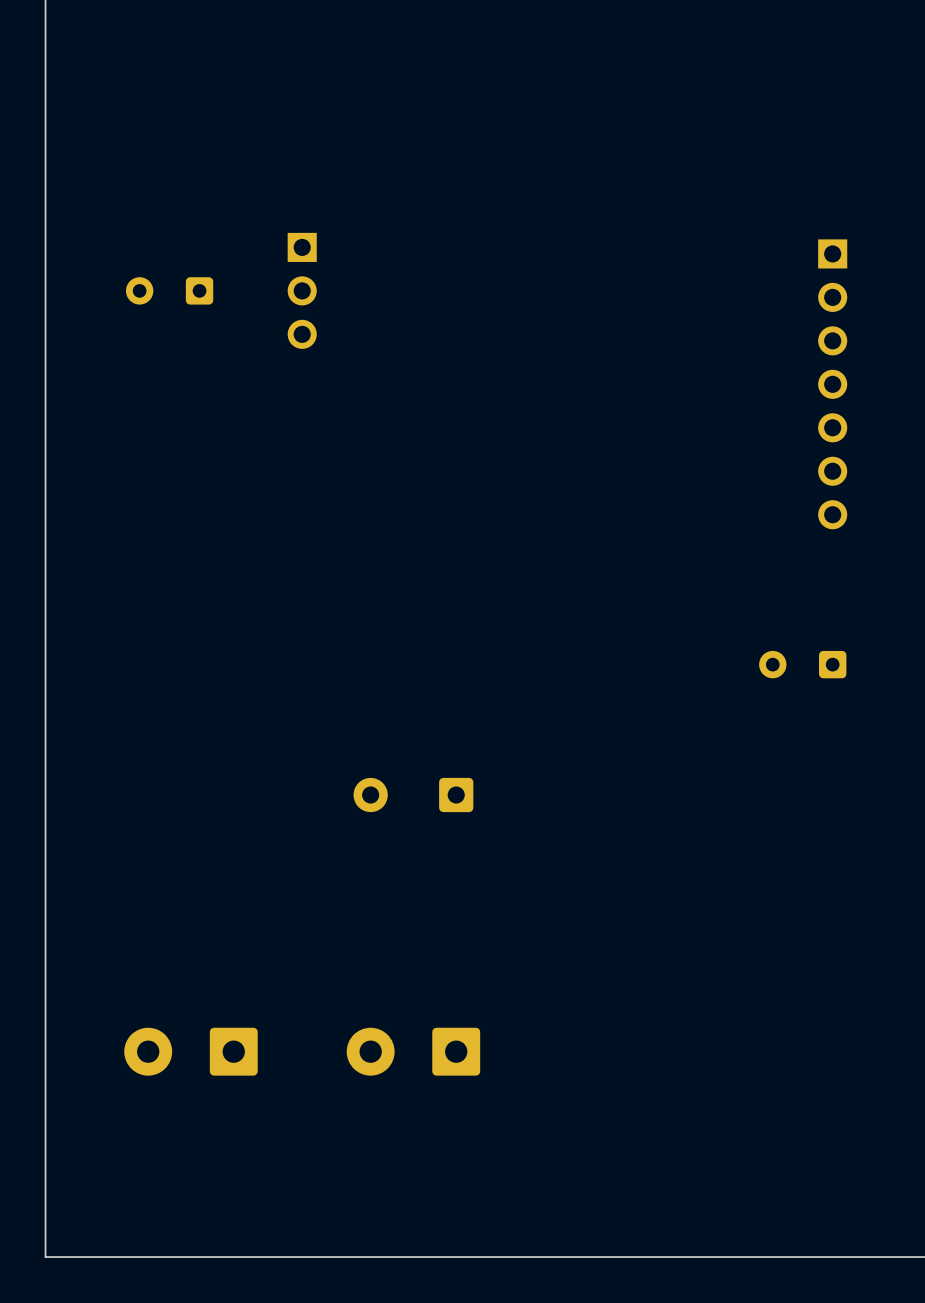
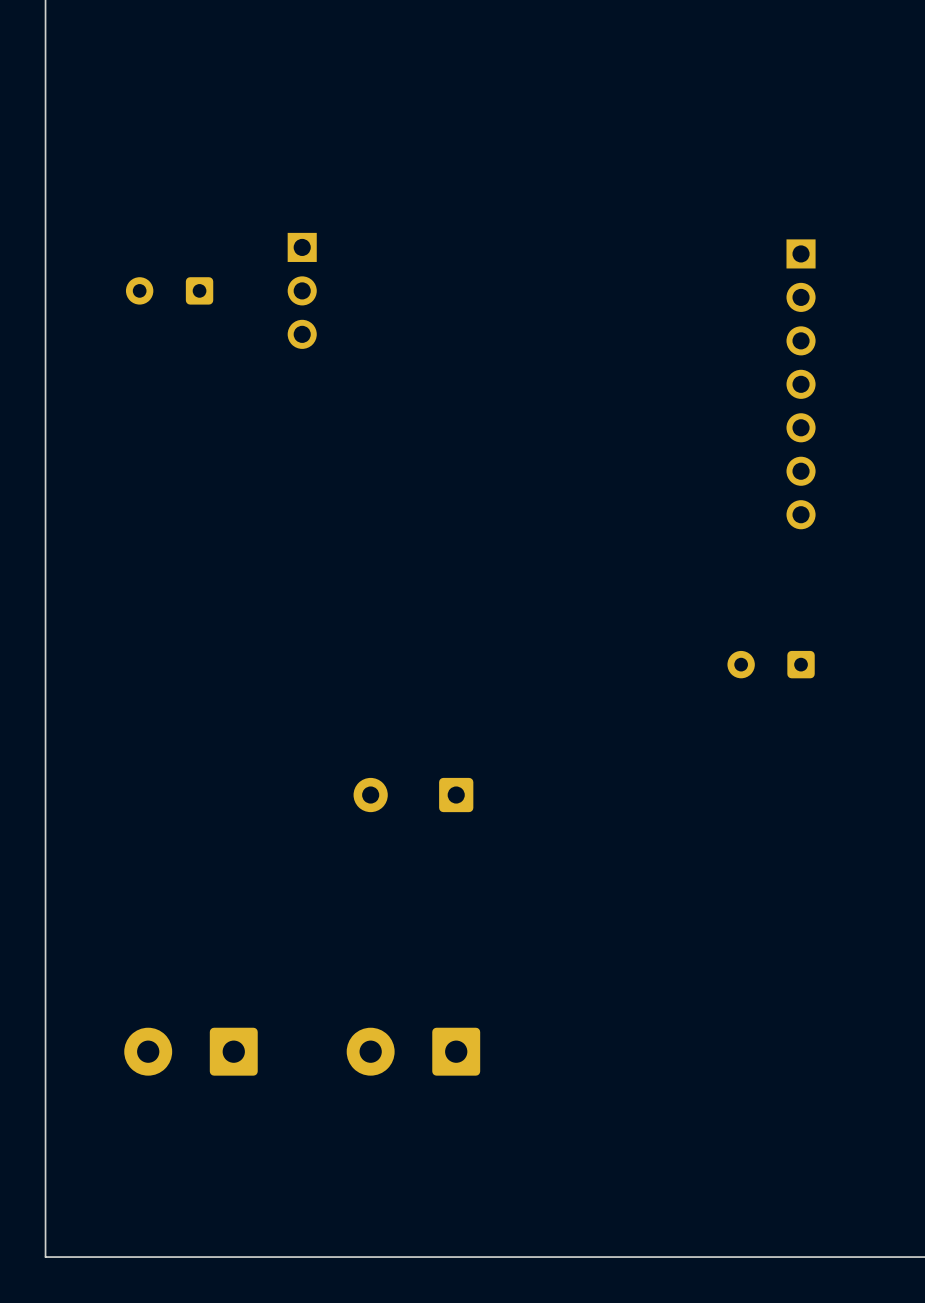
part position: (832, 384) -> (801, 384)
part position: (802, 664) -> (771, 664)

